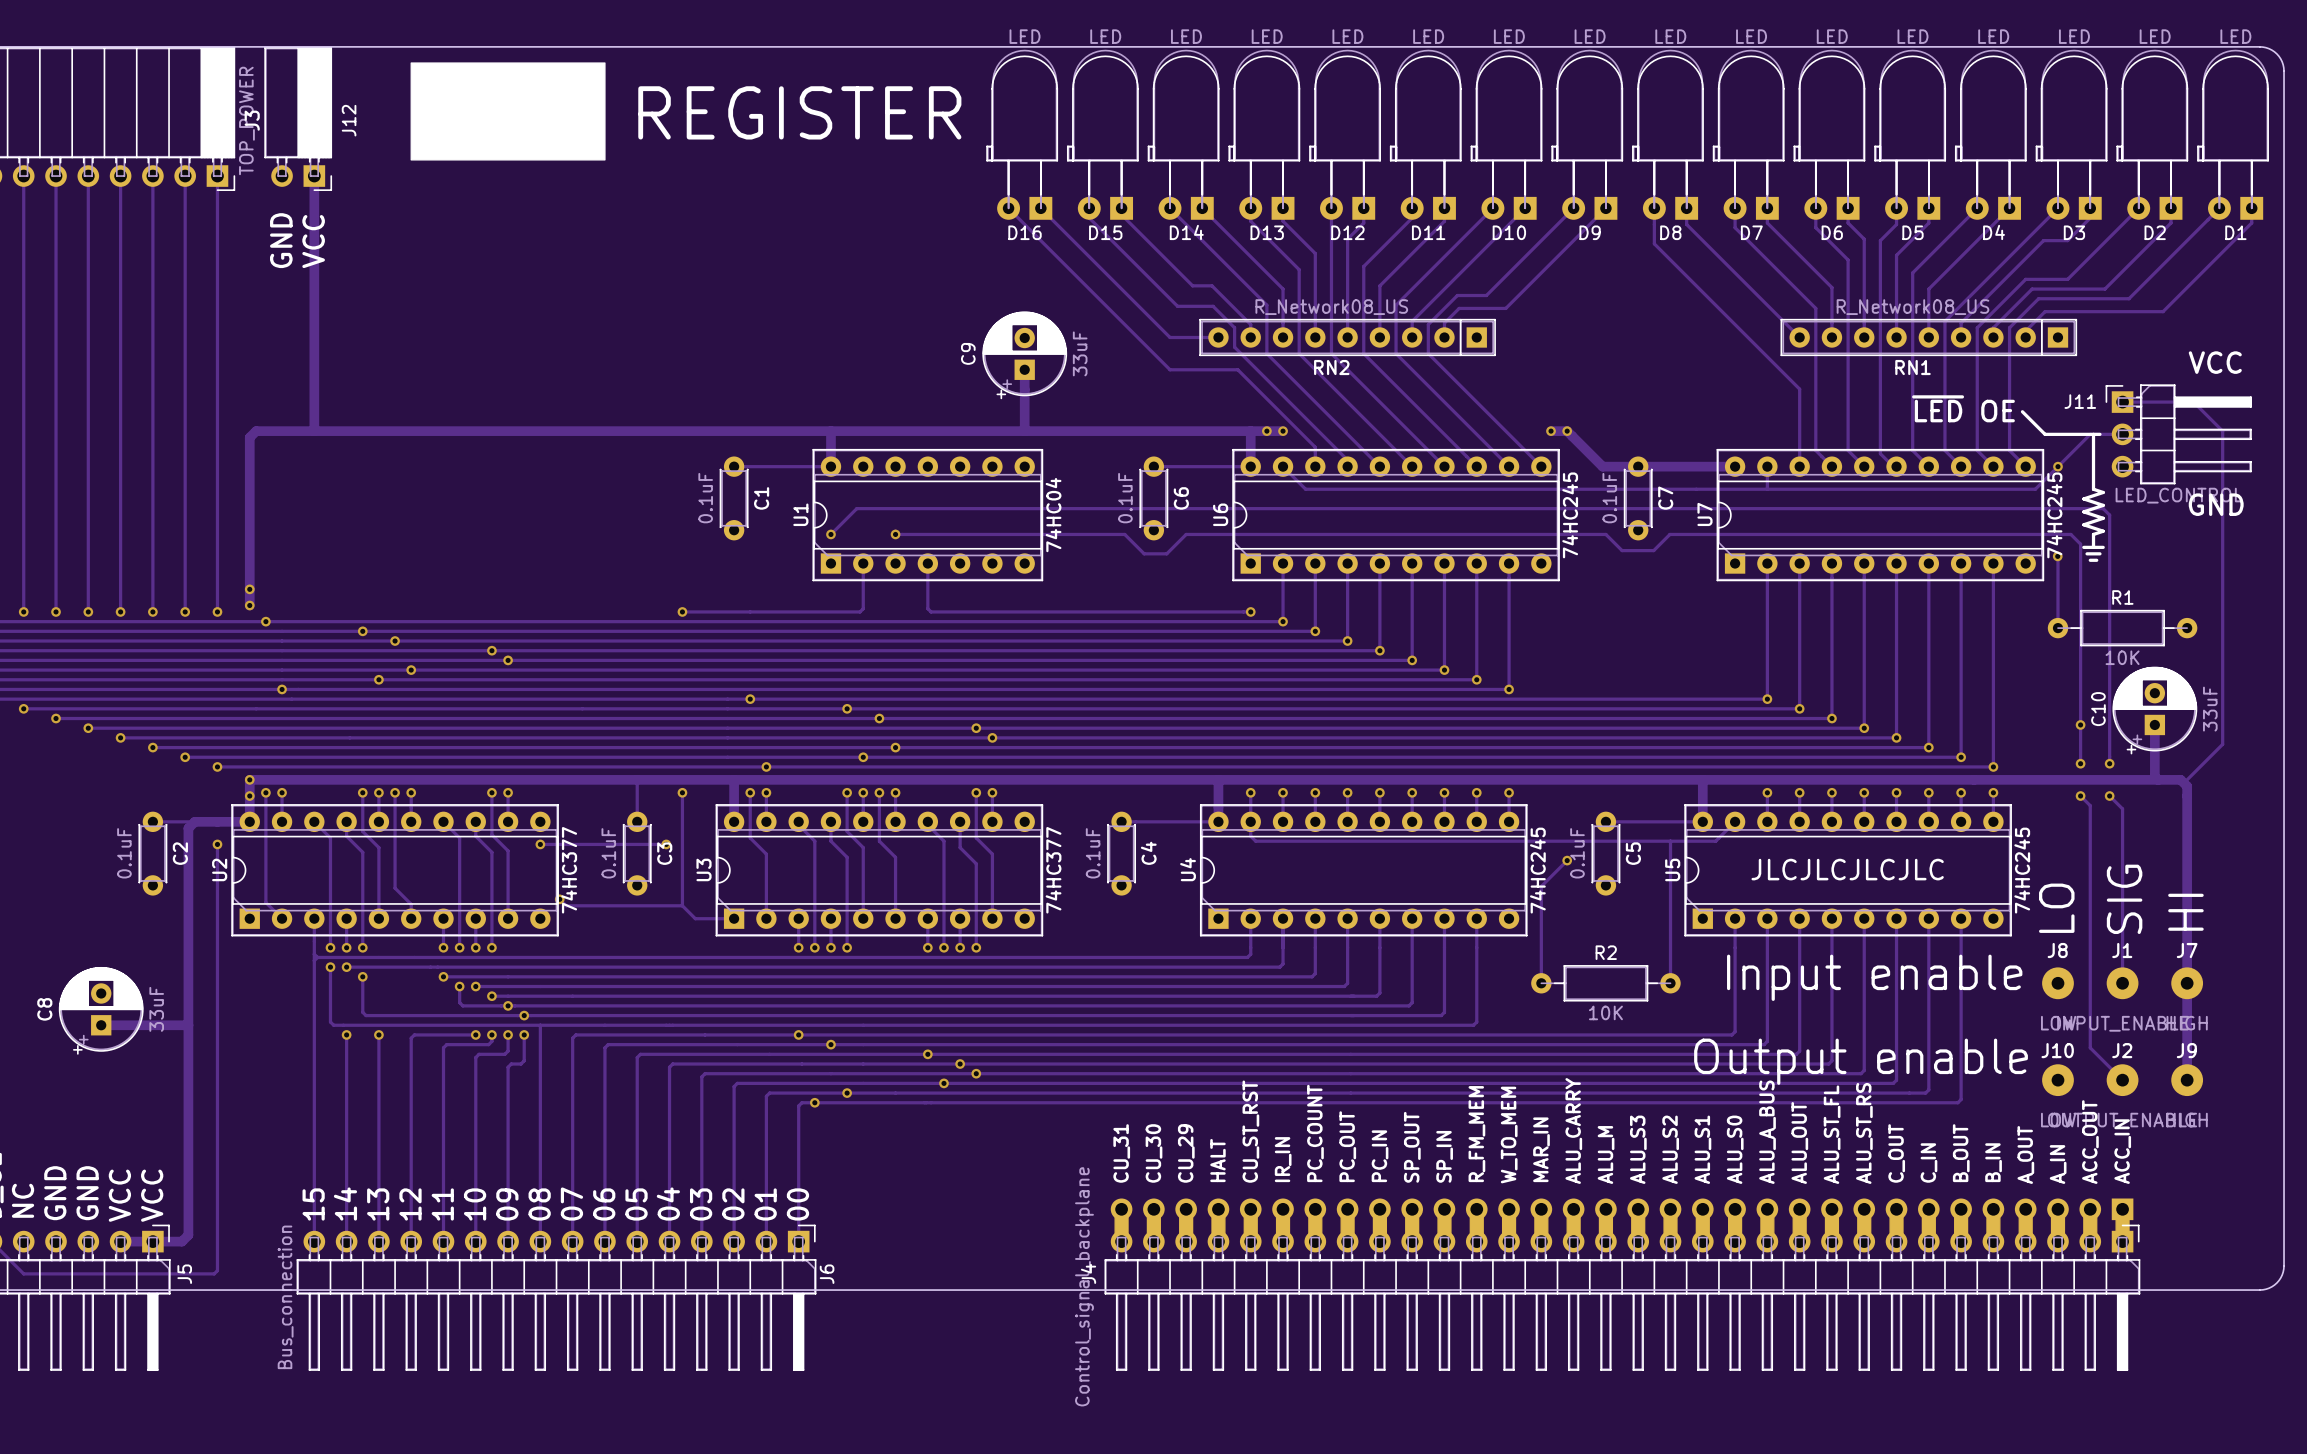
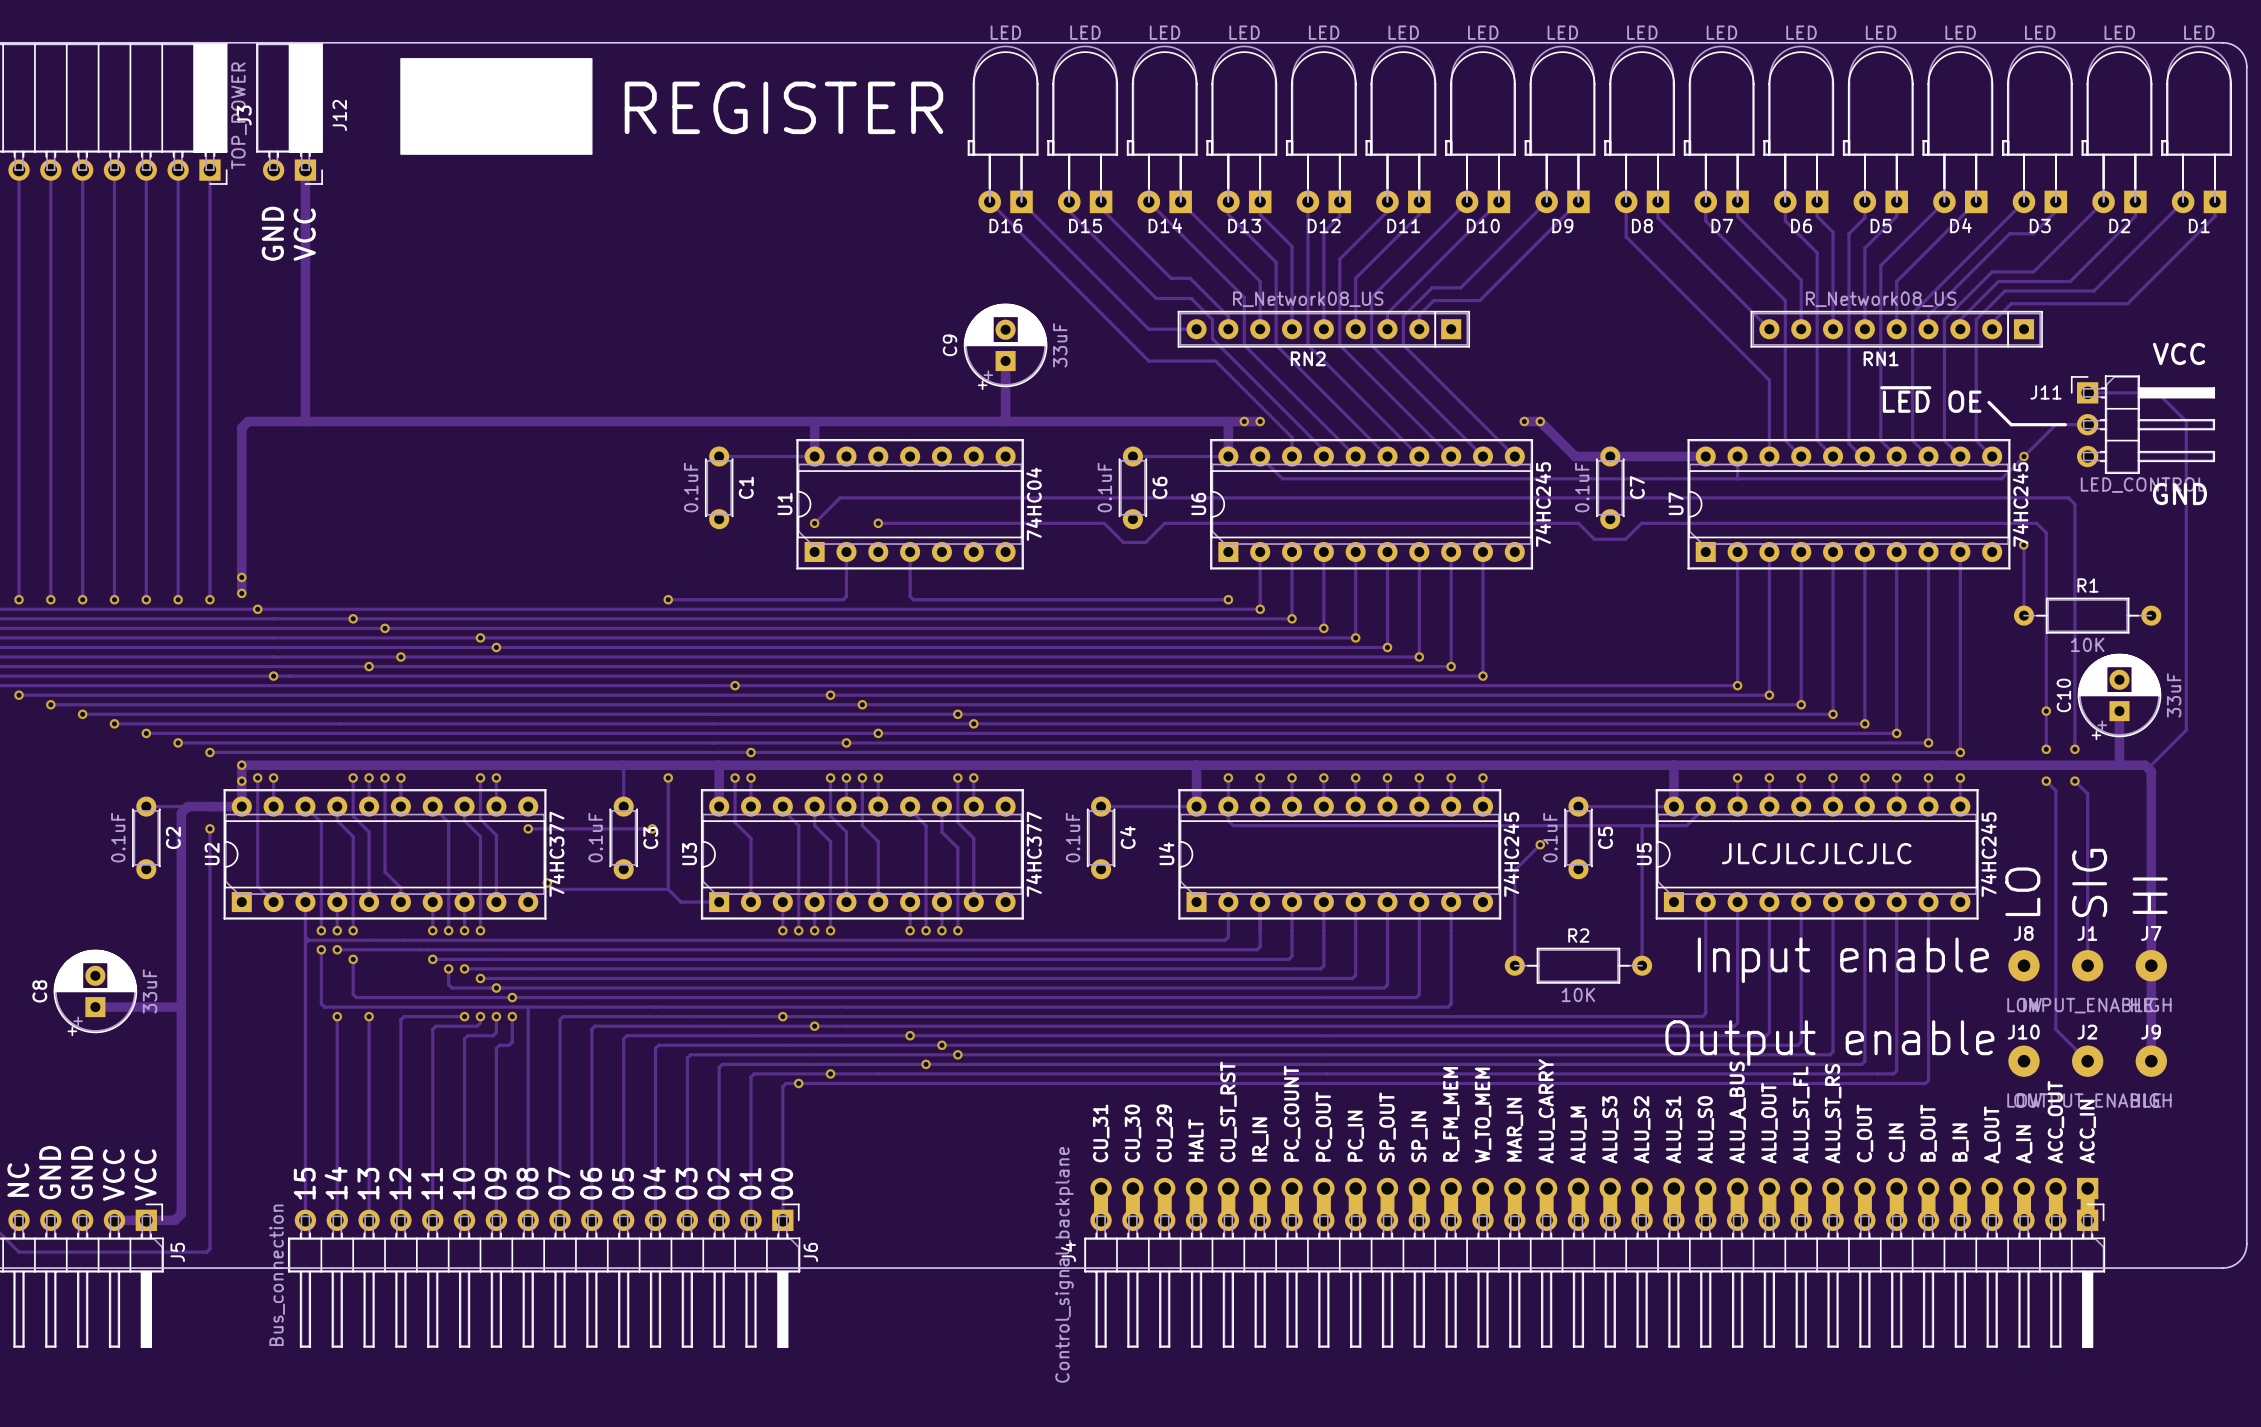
line: (2093, 434) (2093, 489) (2103, 492) (2083, 498) (2103, 505) (2083, 511) (2103, 518) (2083, 524) (2103, 531) (2093, 534) (2093, 547) -> none
line: (2083, 547) (2103, 547) -> none
line: (2087, 553) (2099, 553) -> none
line: (2090, 560) (2096, 560) -> none

